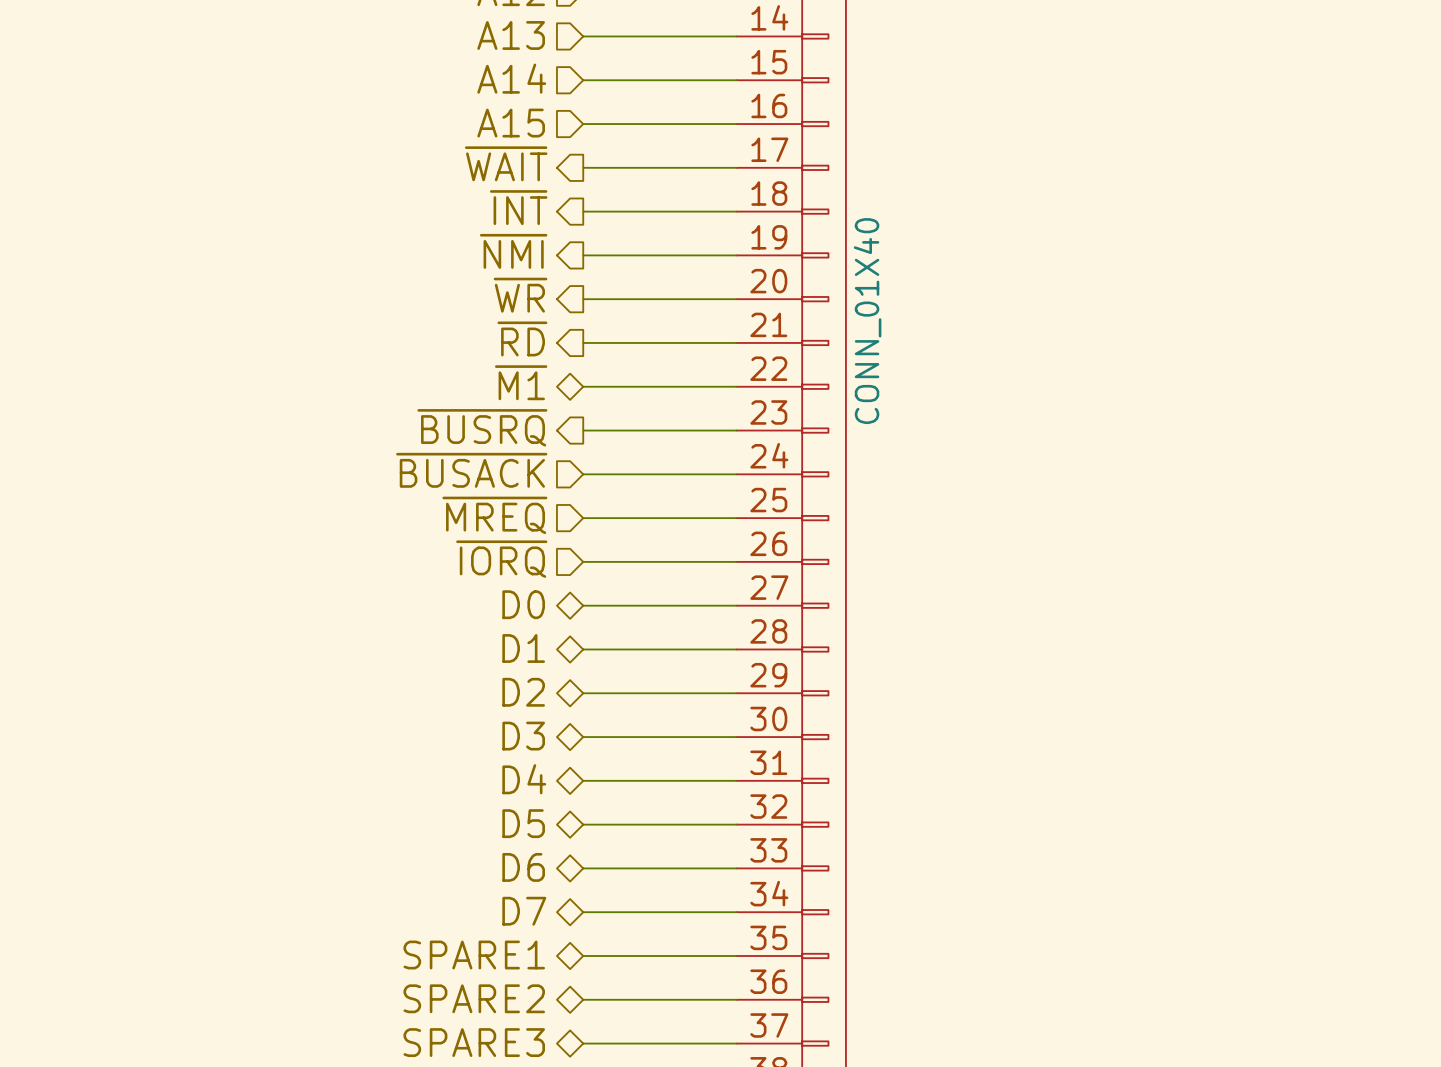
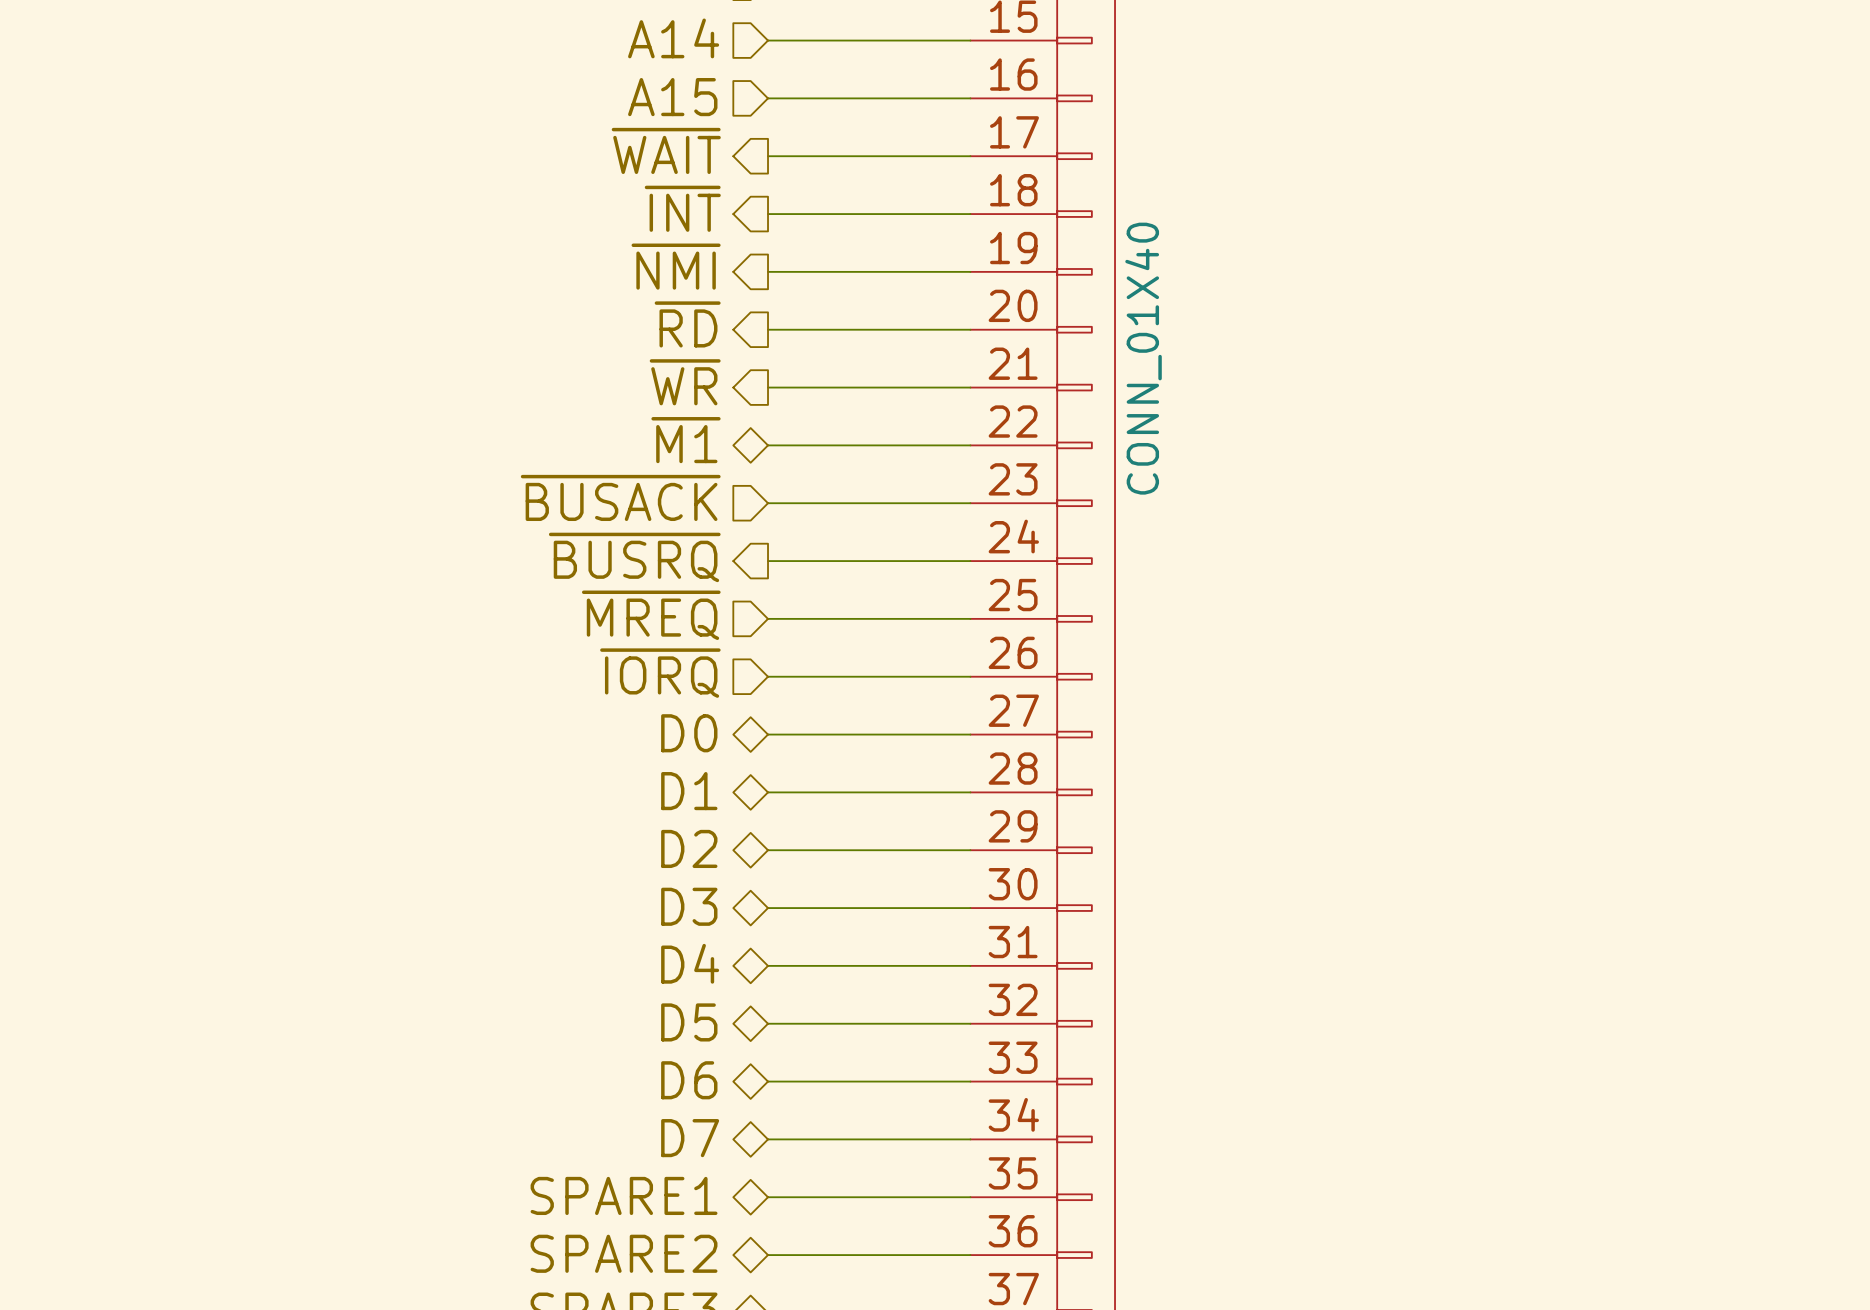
hierarchical label: ~{WR} (520, 295) -> ~{RD} (687, 324)
hierarchical label: ~{RD} (522, 338) -> ~{WR} (685, 382)
hierarchical label shape: output (482, 427) -> input (620, 497)
hierarchical label: ~{BUSRQ} (482, 427) -> ~{BUSACK} (620, 497)
hierarchical label shape: input (471, 470) -> output (634, 557)
hierarchical label: ~{BUSACK} (471, 470) -> ~{BUSRQ} (634, 557)

